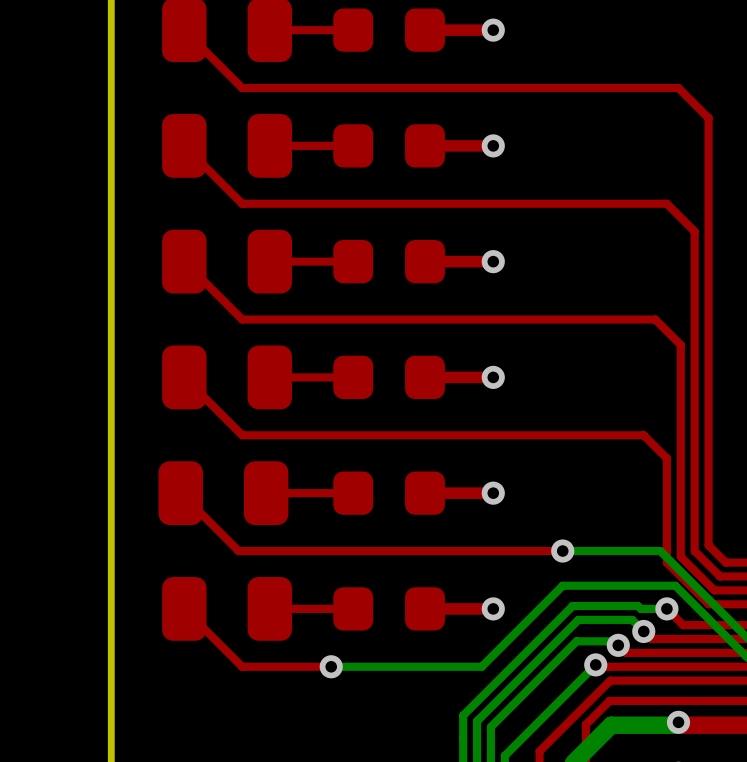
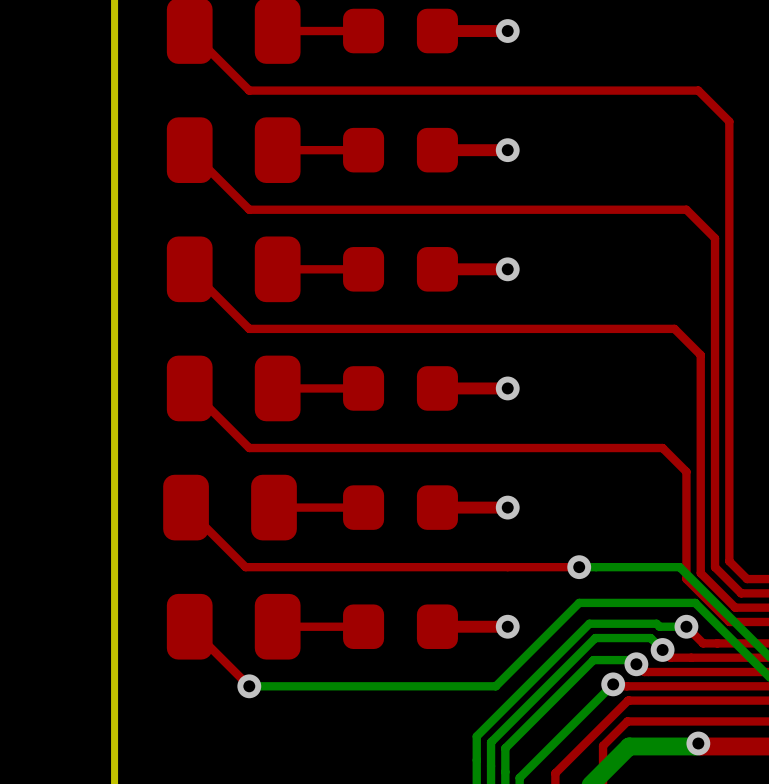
top track: (331, 666) (242, 666) -> none
bottom track: none -> (340, 686) (249, 686)
via position: (331, 666) -> (249, 686)

